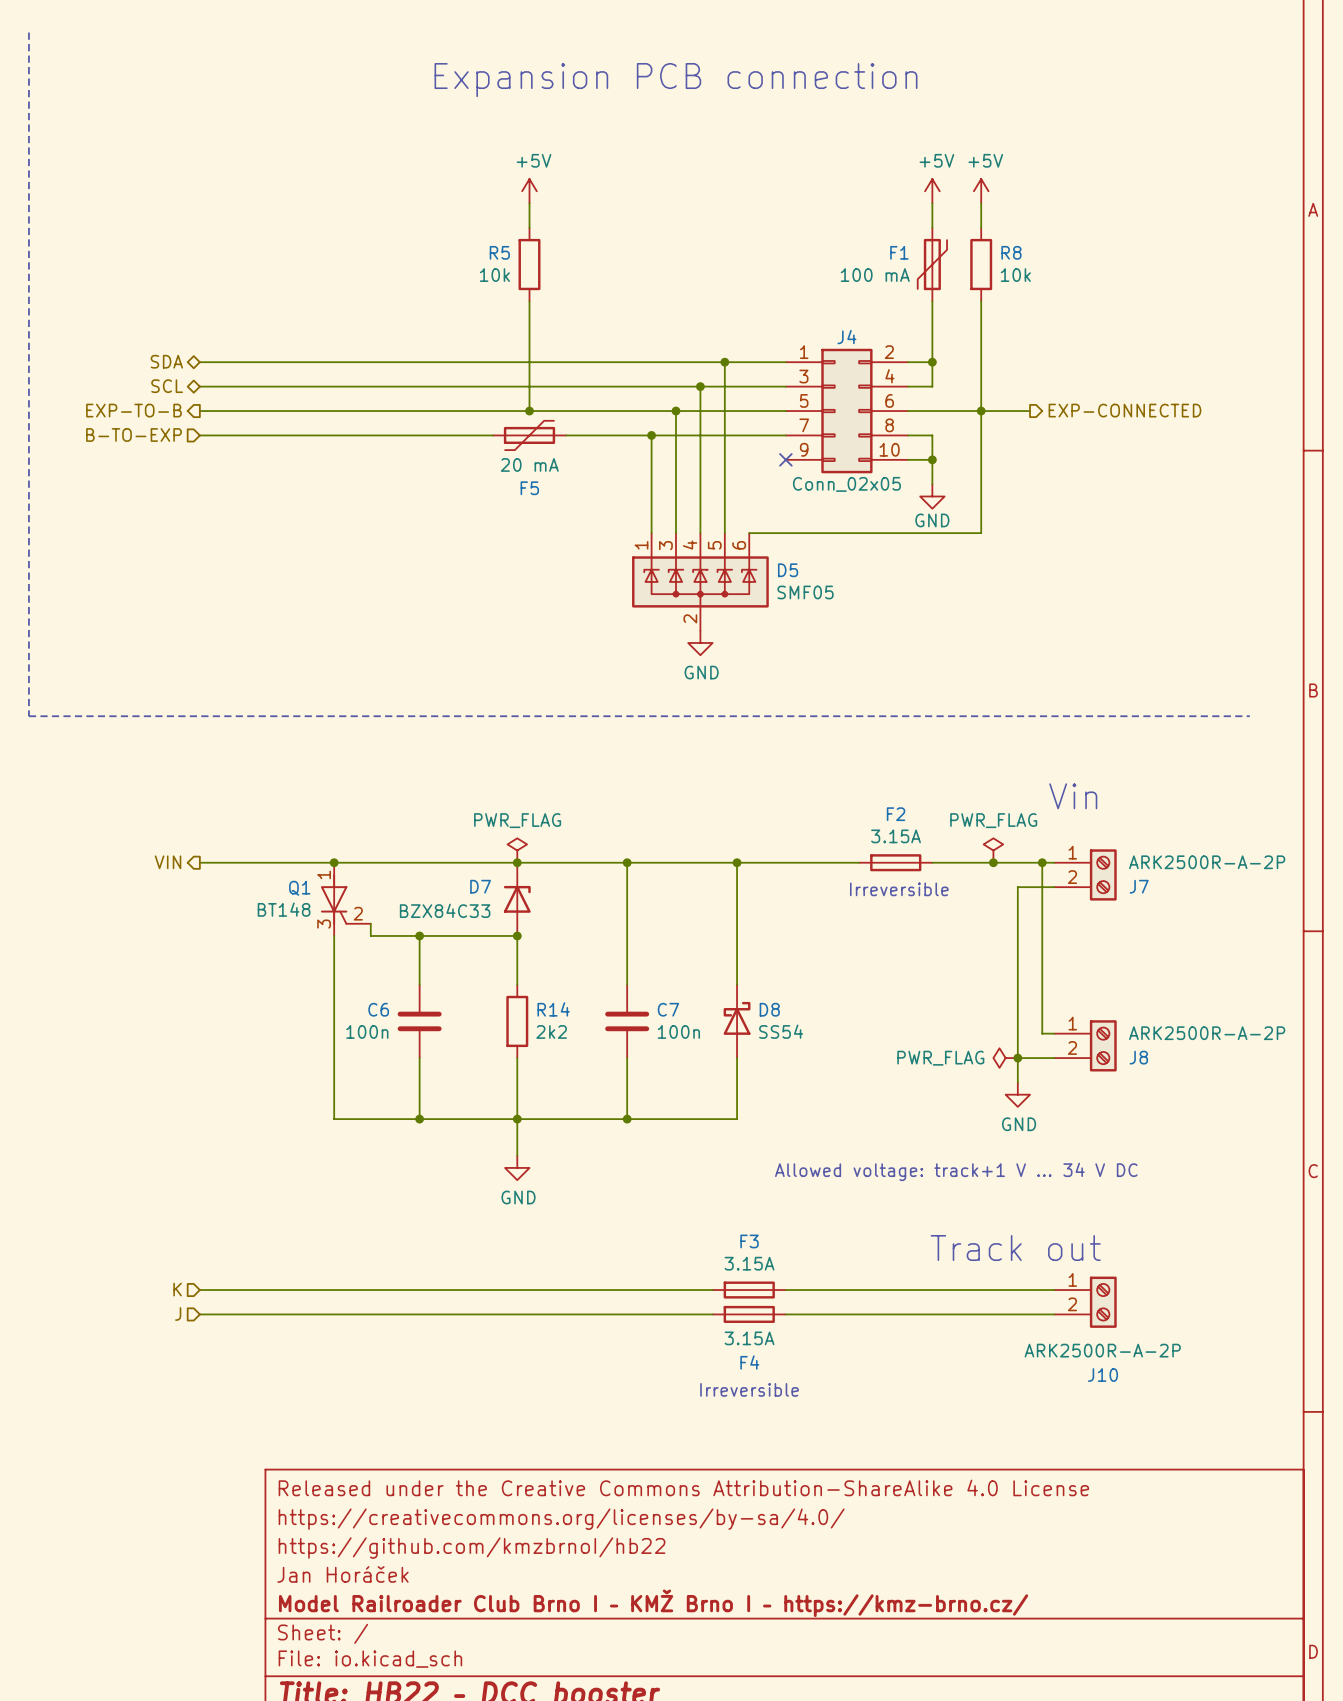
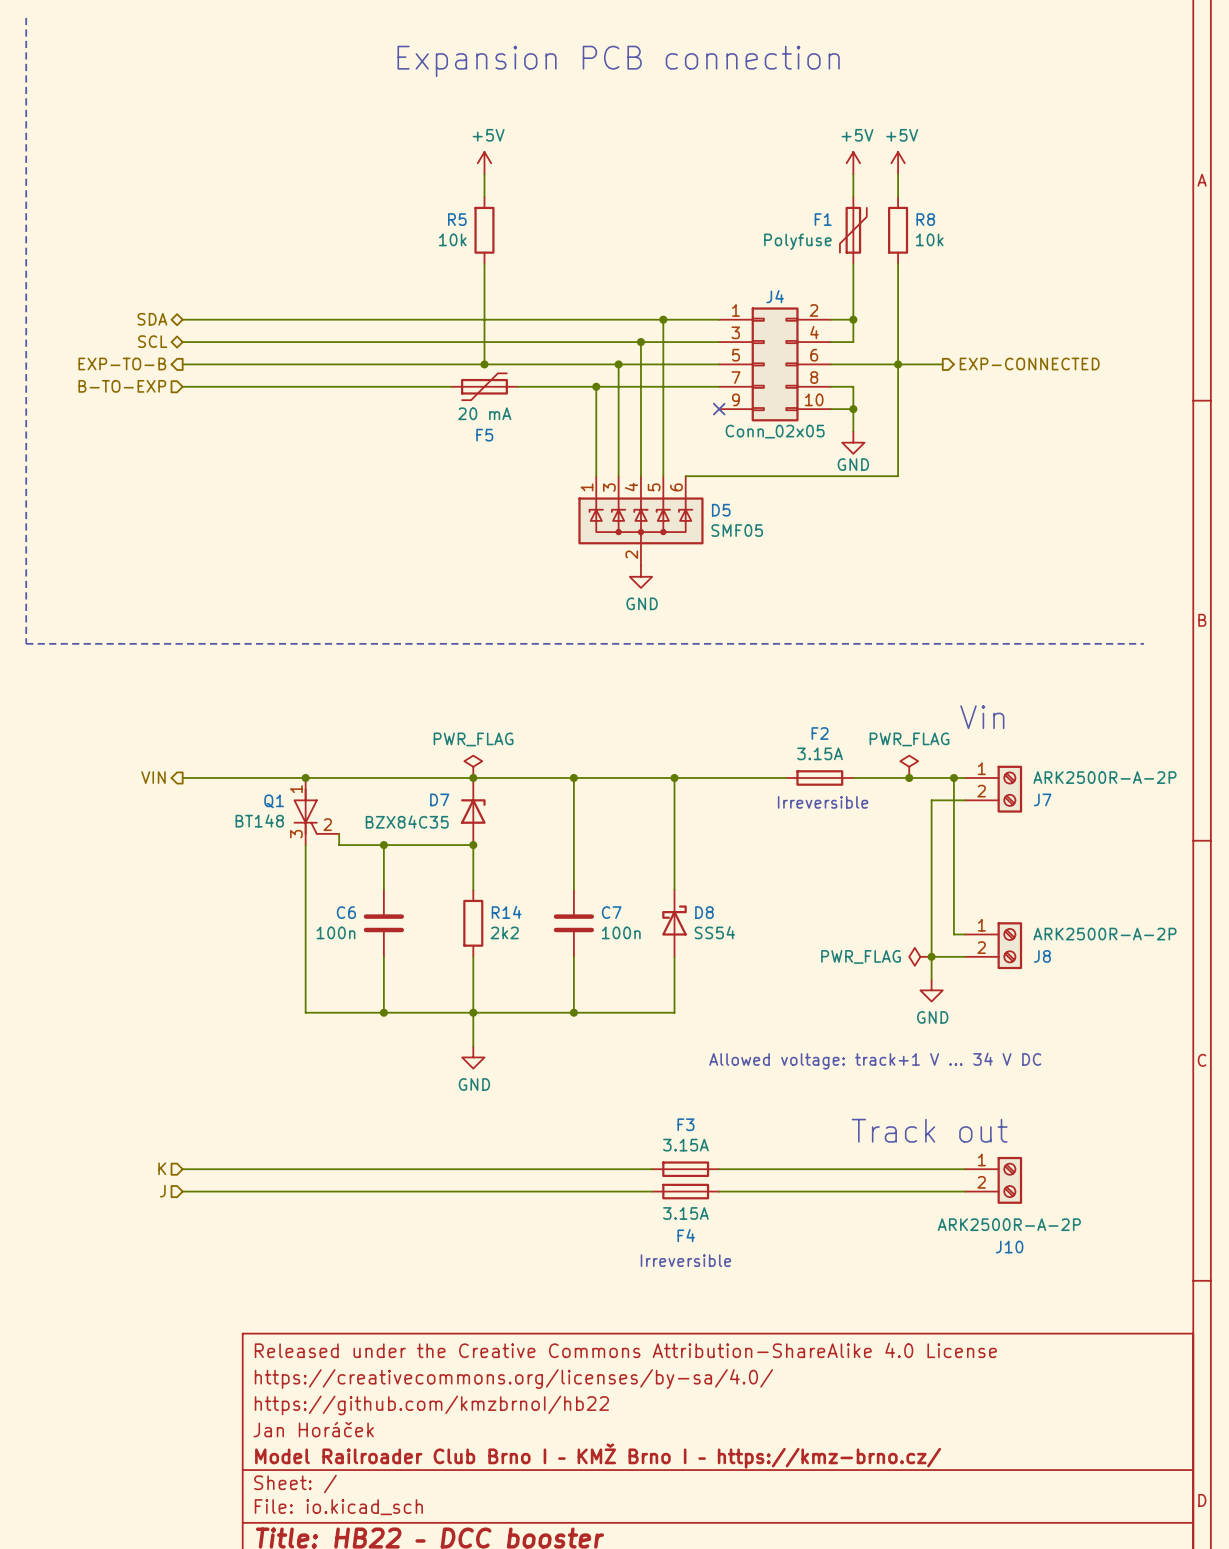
F1 value: 100 mA (875, 275) -> Polyfuse (797, 241)
D7 value: BZX84C33 (445, 910) -> BZX84C35 (407, 822)

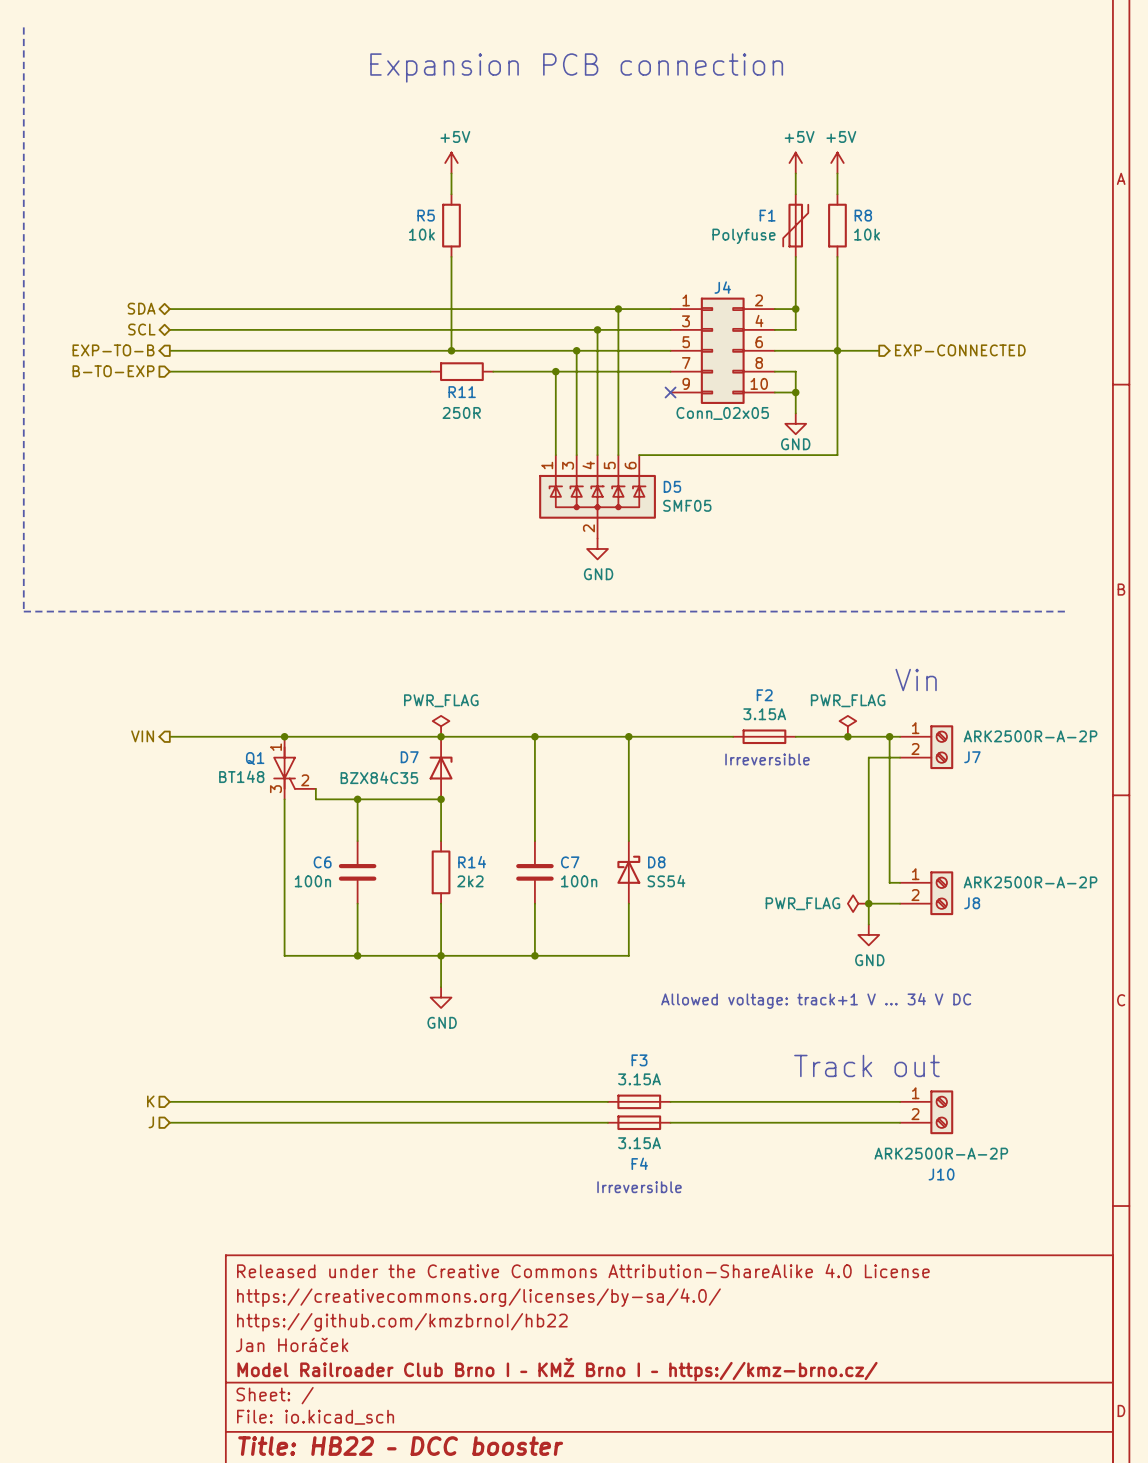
F5: 20 mA (484, 386) -> none
R11: none -> 250R (461, 371)

